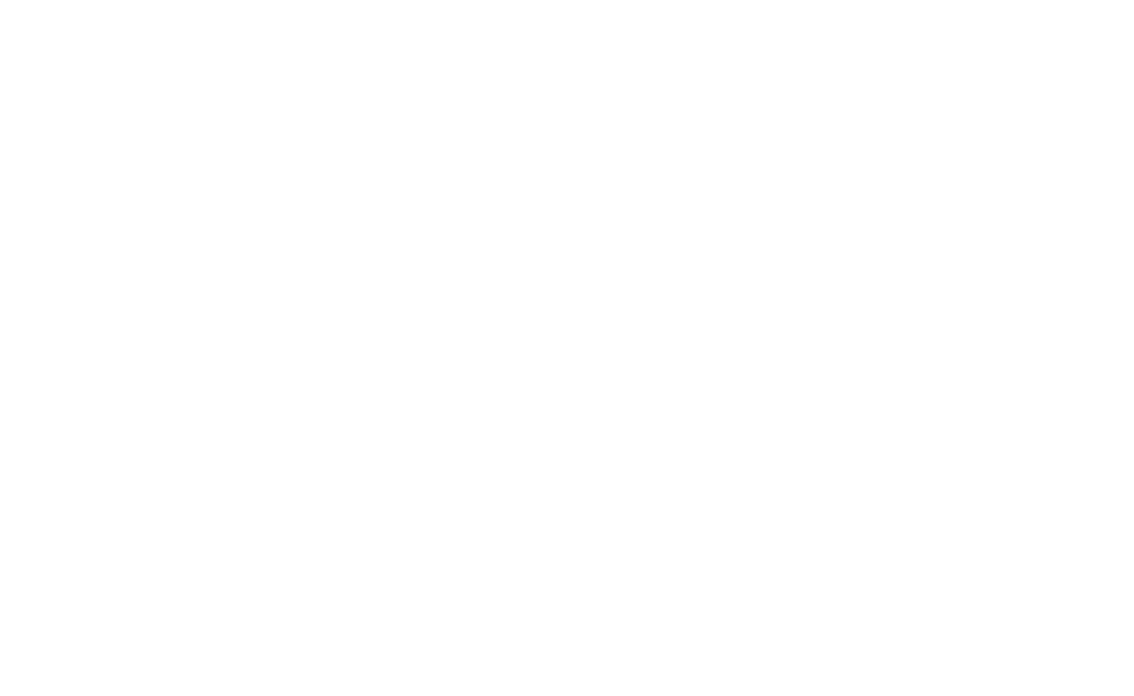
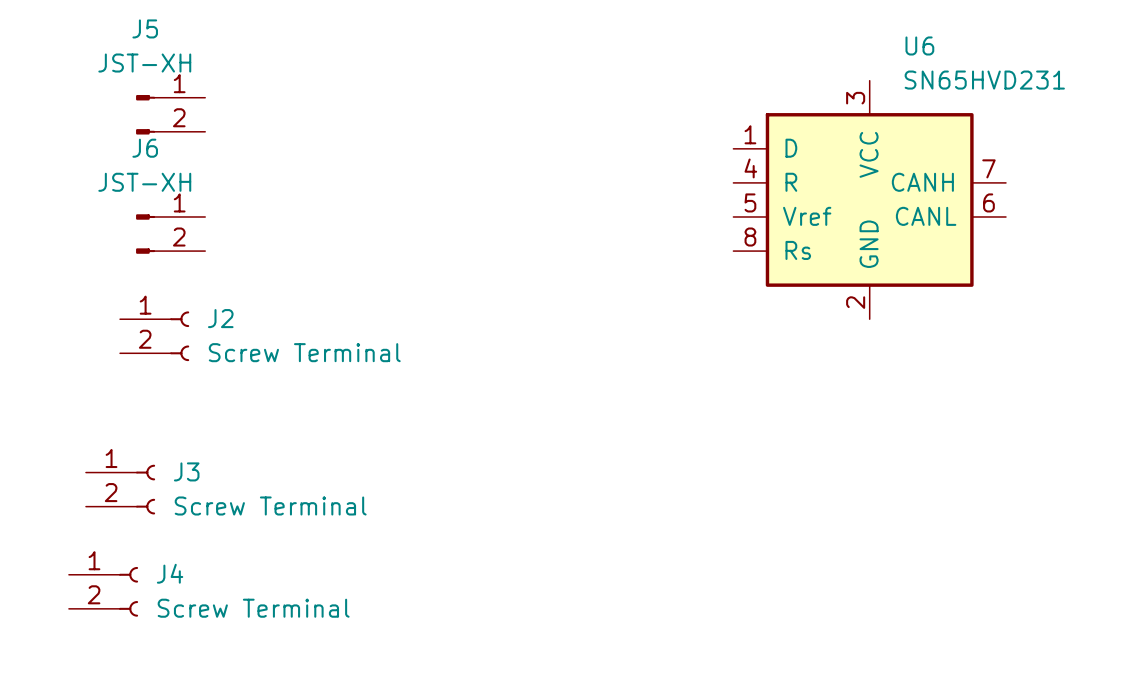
J5: none -> JST-XH (170, 114)
U6: none -> SN65HVD231 (869, 199)
J6: none -> JST-XH (170, 234)
J2: none -> Screw Terminal (154, 336)
J3: none -> Screw Terminal (120, 489)
J4: none -> Screw Terminal (103, 591)

